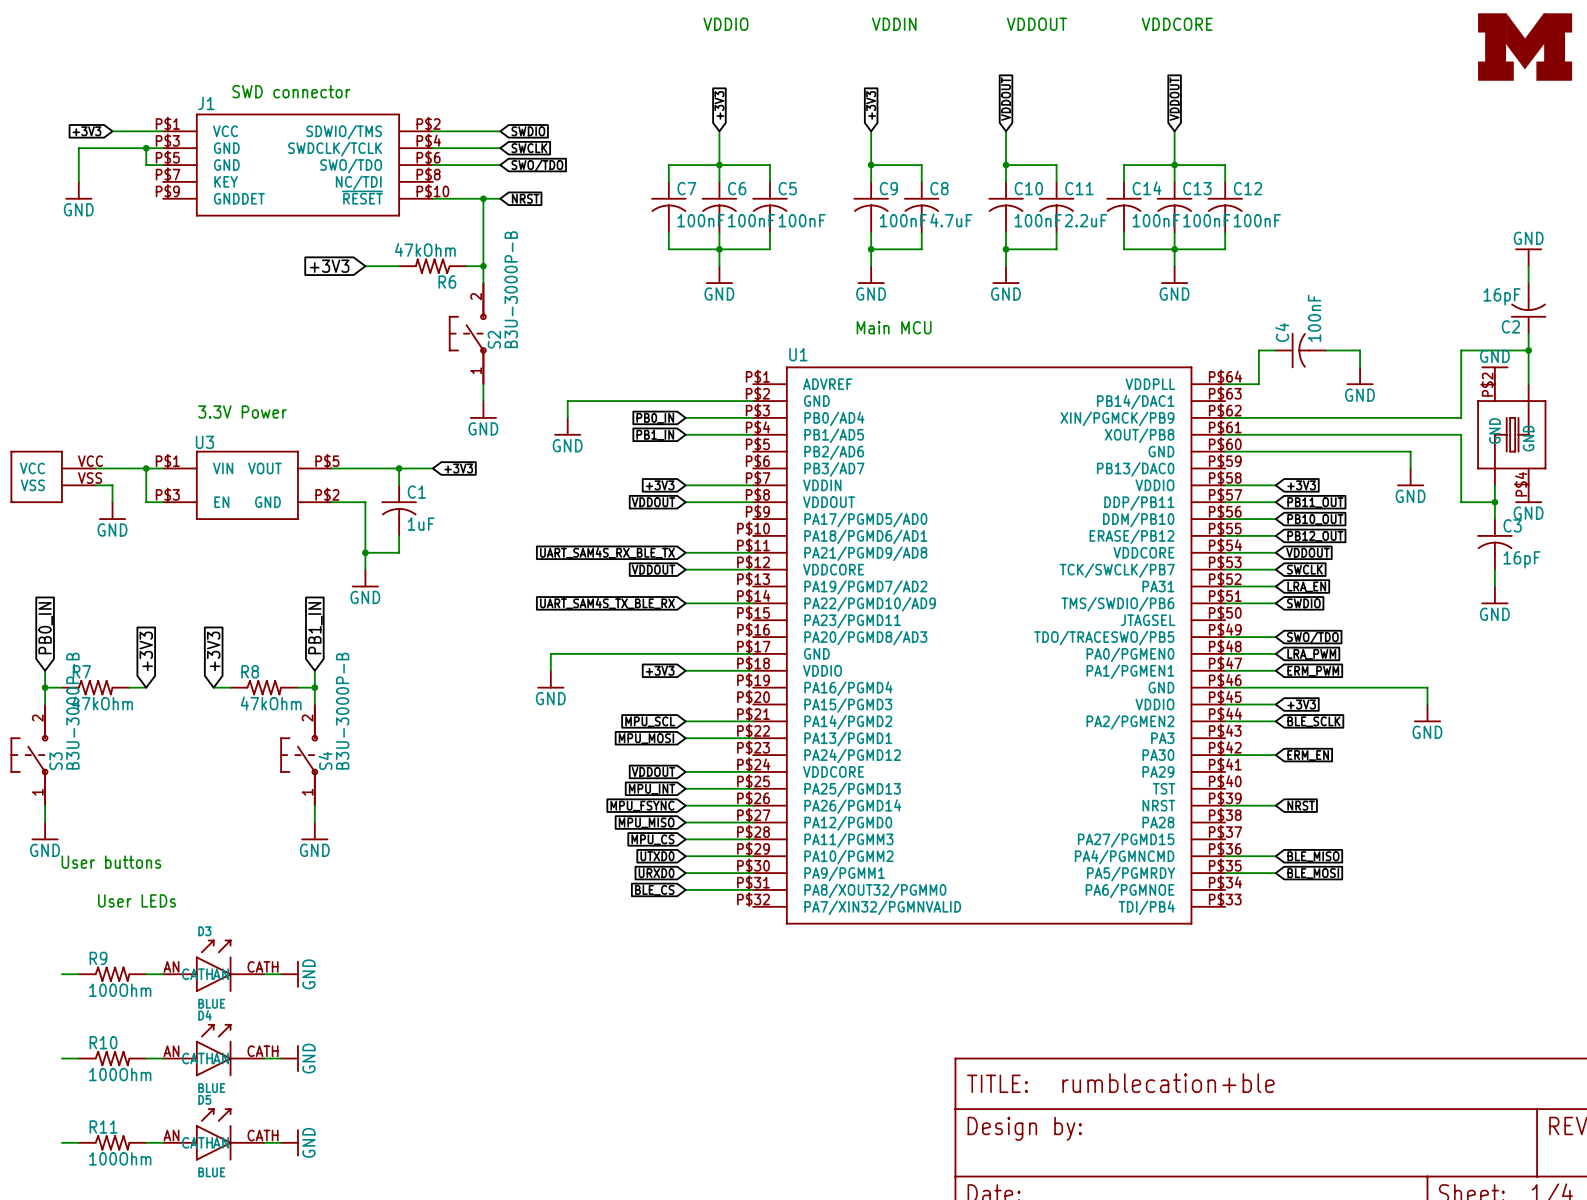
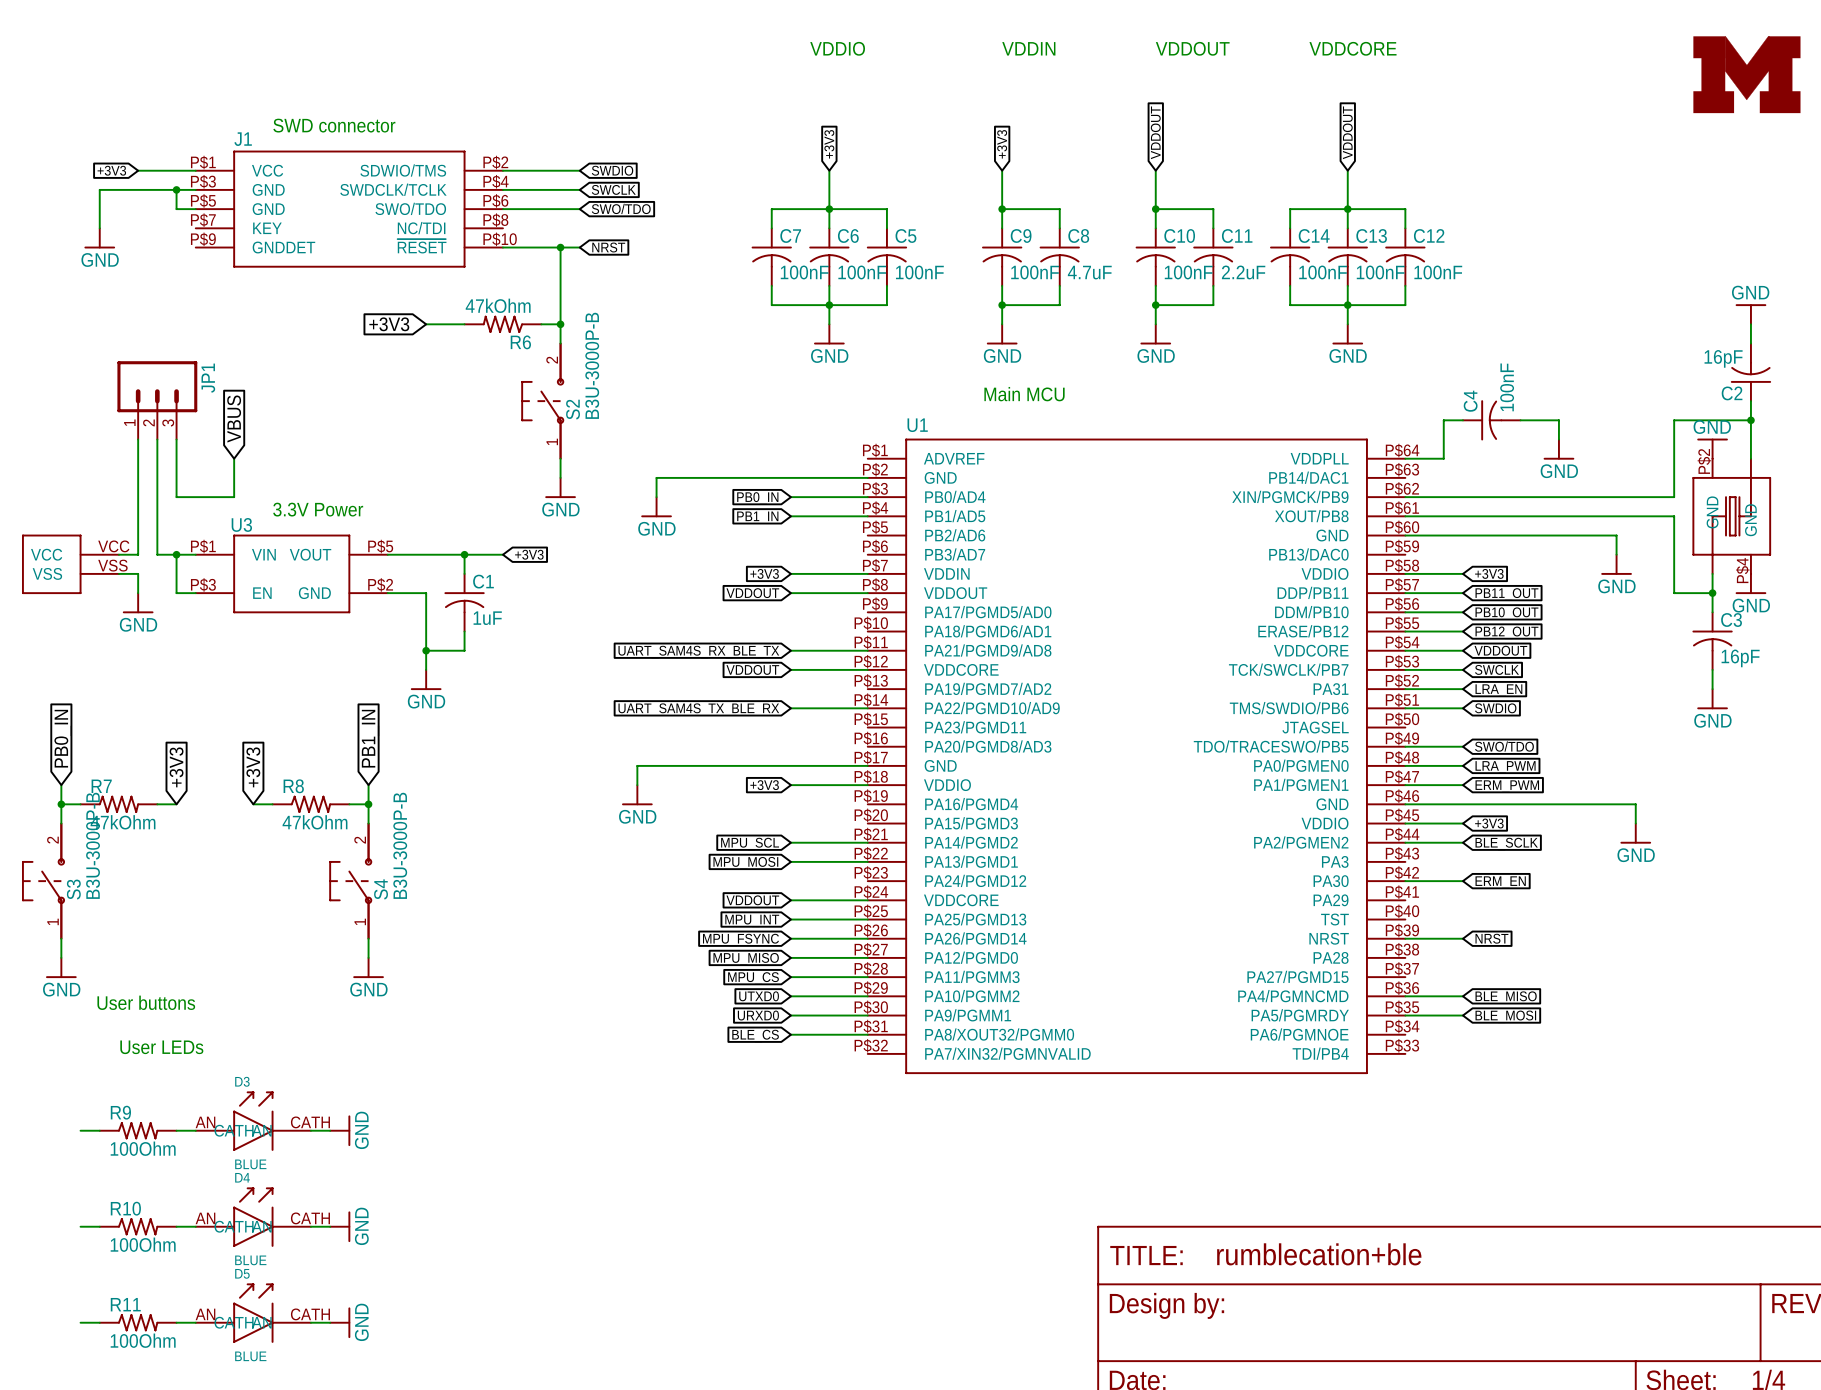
JP1: none -> (157, 400)
global label: none -> VBUS (234, 419)
wire: none -> (157, 439) (157, 554)
wire: none -> (176, 439) (176, 497) (234, 497) (234, 458)
text position: 3.3V Power (242, 412) -> 3.3V Power (318, 509)
wire: (112, 468) (129, 468) -> (138, 554) (138, 439)

